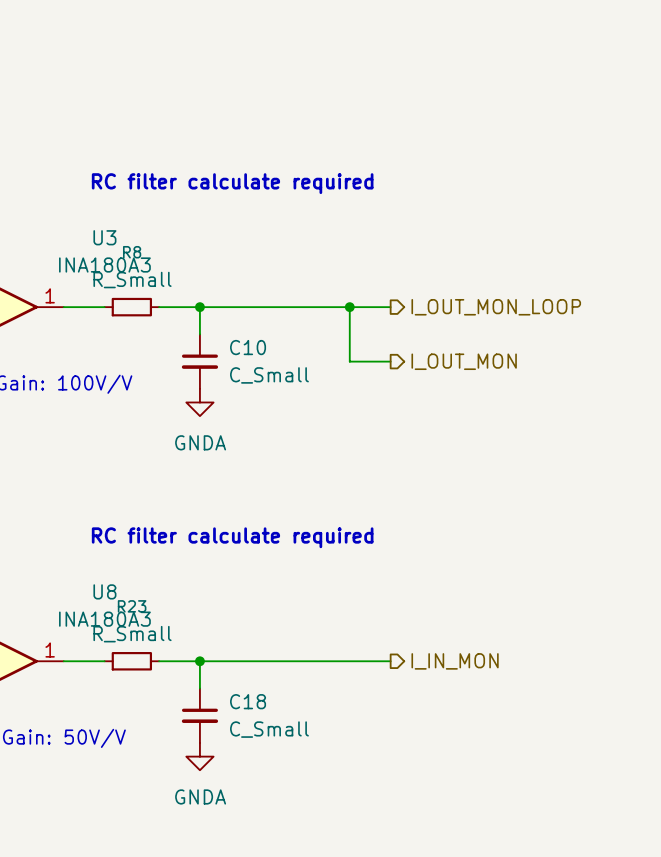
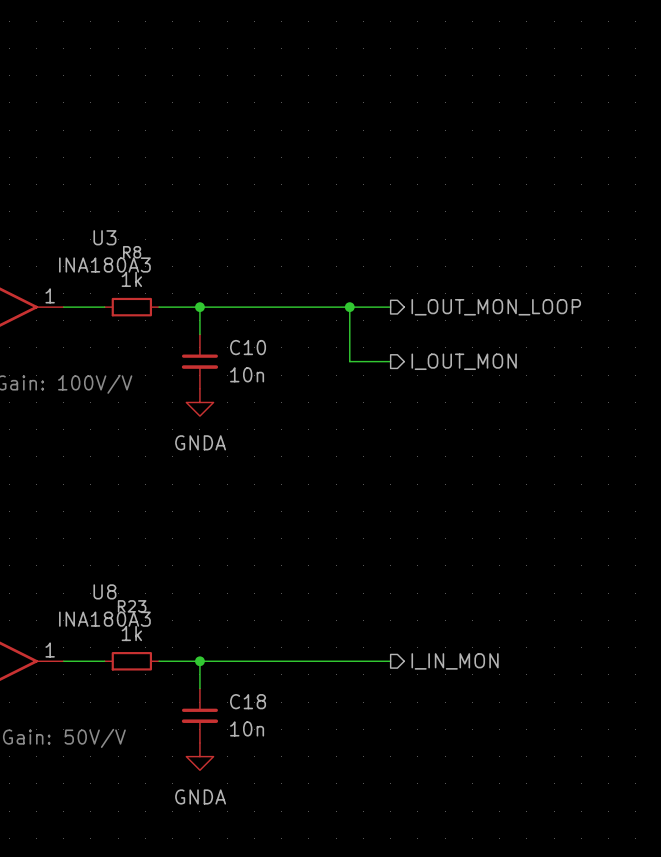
text: RC filter calculate required (232, 183) -> none
R8 value: R_Small (132, 280) -> 1k (131, 279)
C10 value: C_Small (269, 375) -> 10n (247, 374)
text: RC filter calculate required (232, 537) -> none
R23 value: R_Small (132, 634) -> 1k (131, 633)
C18 value: C_Small (269, 729) -> 10n (247, 728)

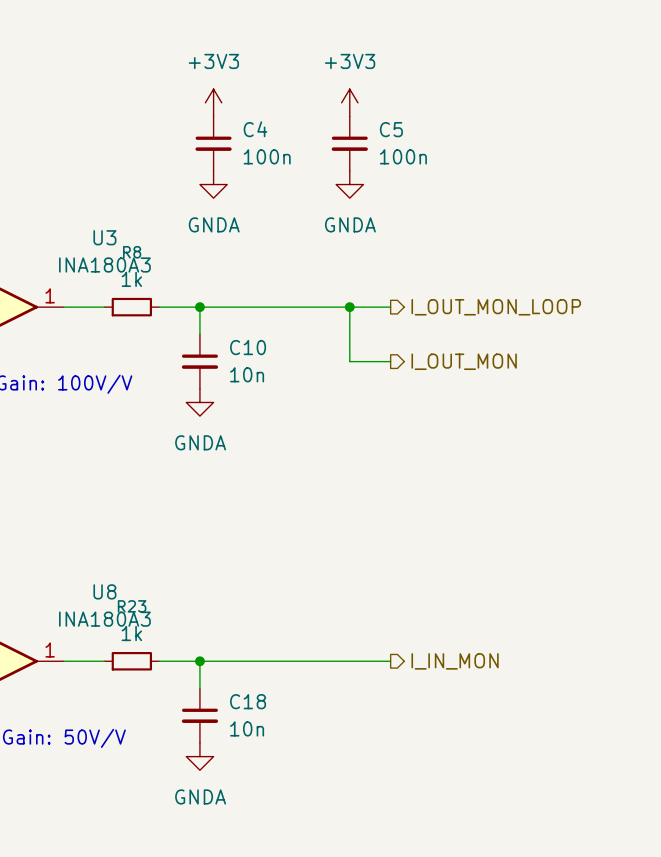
power symbol: none -> +3V3 (213, 102)
power symbol: none -> +3V3 (349, 102)
C4: none -> 100n (213, 143)
C5: none -> 100n (349, 143)
power symbol: none -> GNDA (213, 184)
power symbol: none -> GNDA (349, 184)

